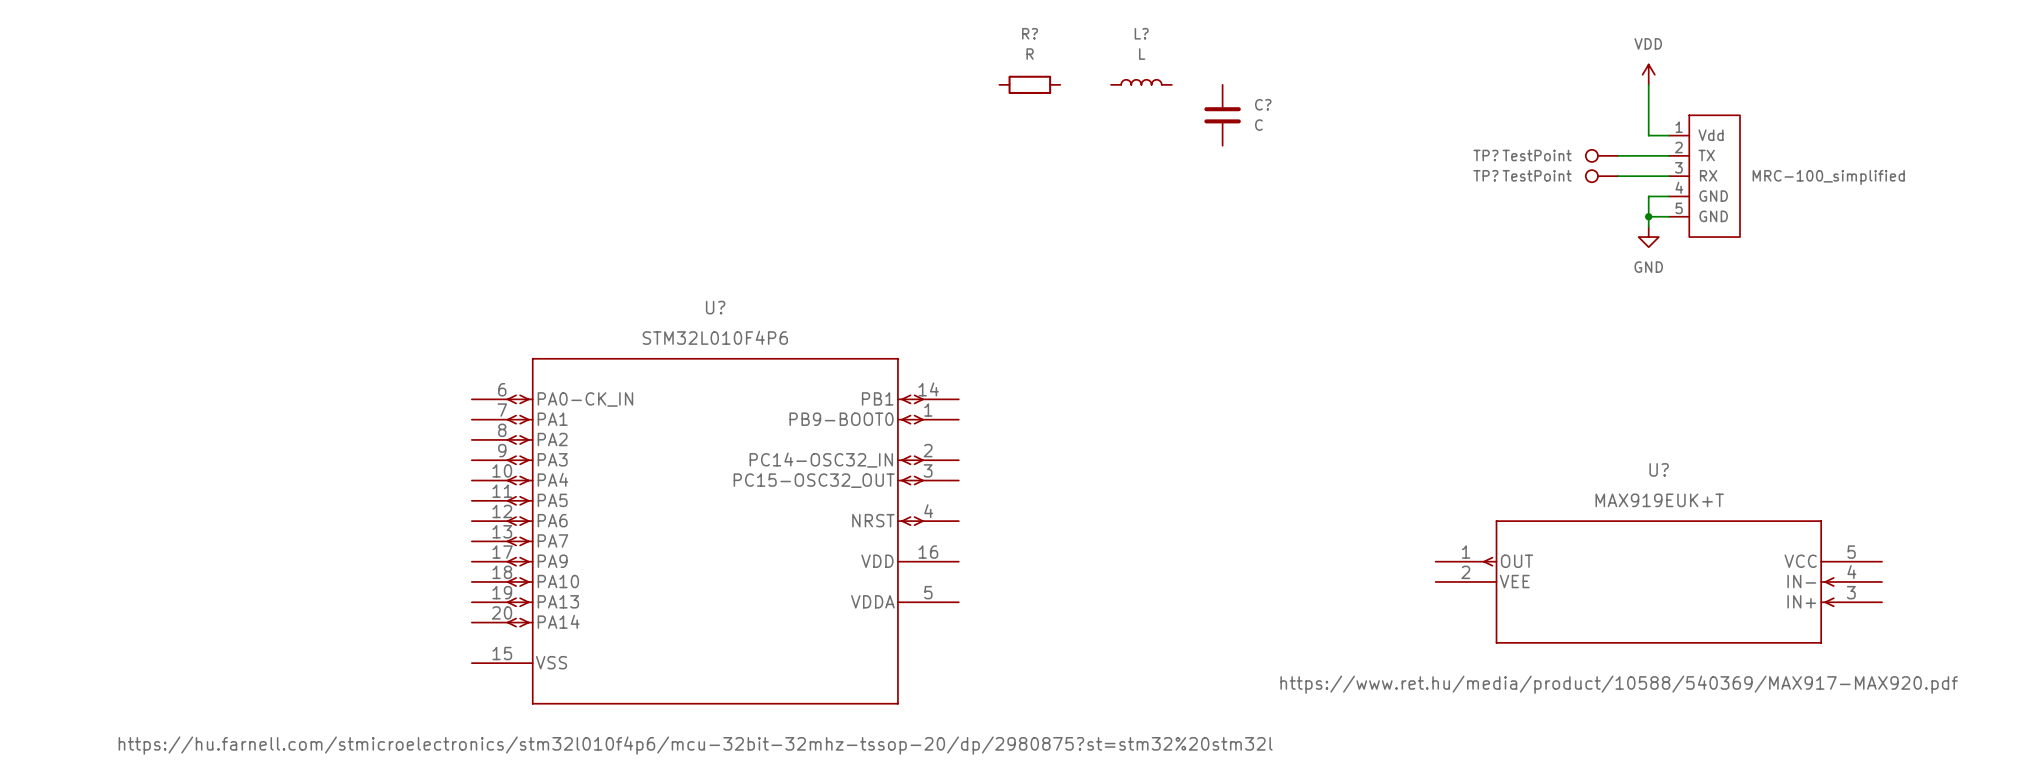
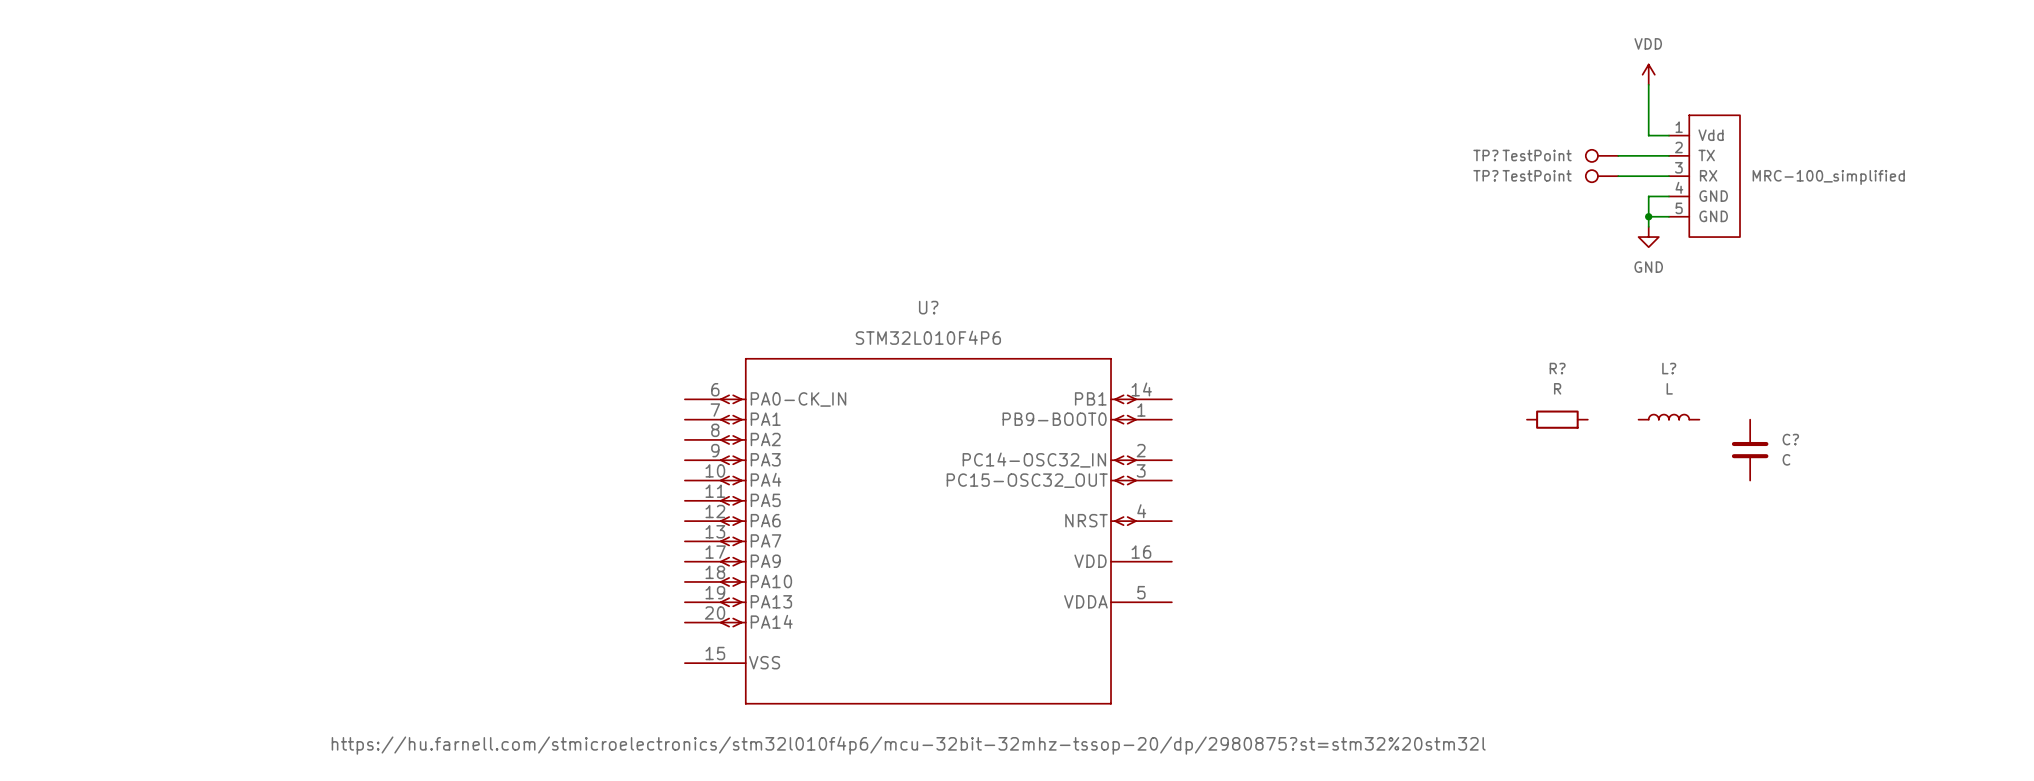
L?: L (1141, 82) -> none
R?: R (1029, 84) -> none
C?: C (1222, 115) -> none
L?: none -> L (1668, 417)
R?: none -> R (1557, 419)
C?: none -> C (1750, 450)
U?: STM32L010F4P6 (715, 531) -> none
U?: none -> STM32L010F4P6 (928, 531)
U?: MAX919EUK+T (1658, 581) -> none

